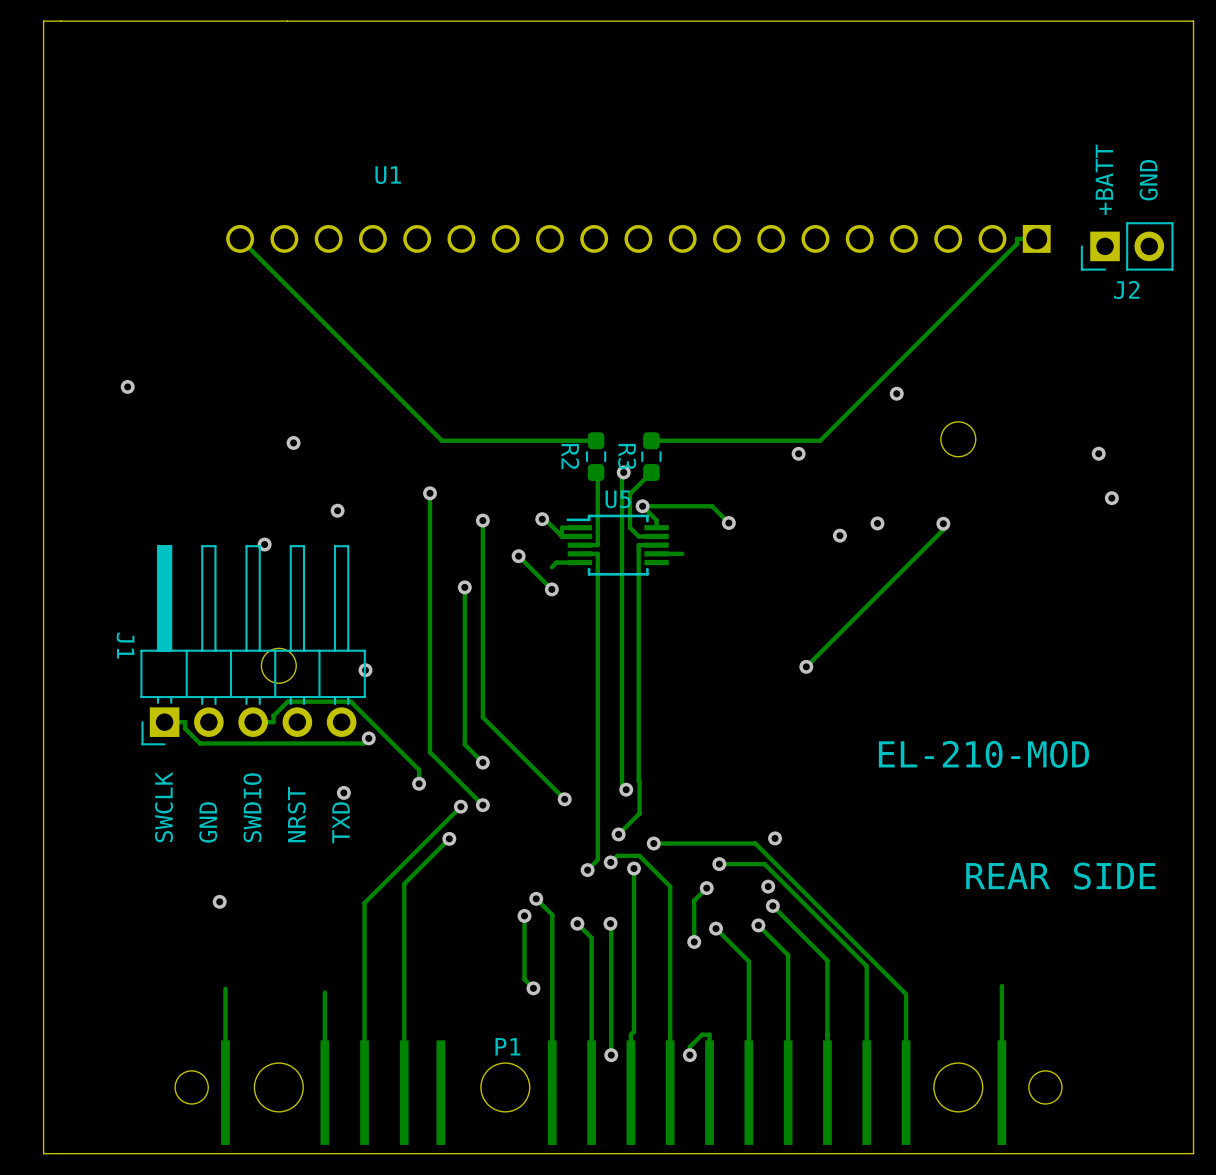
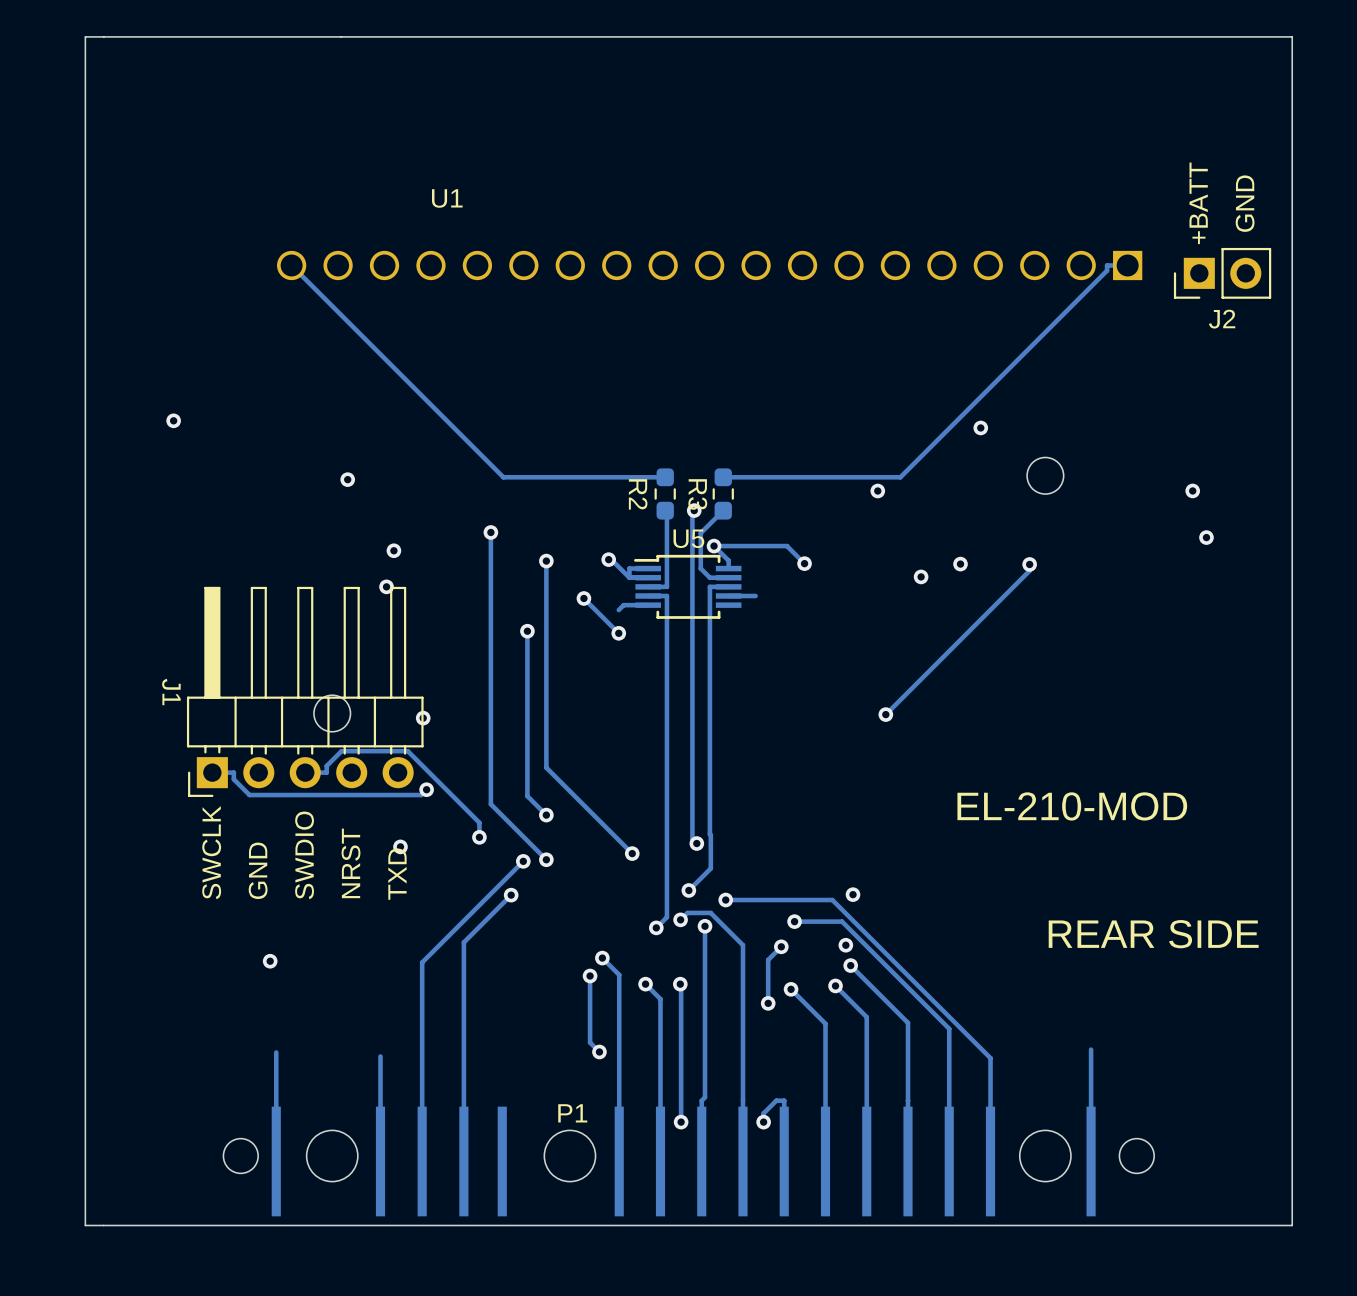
via position: (264, 544) -> (386, 586)

